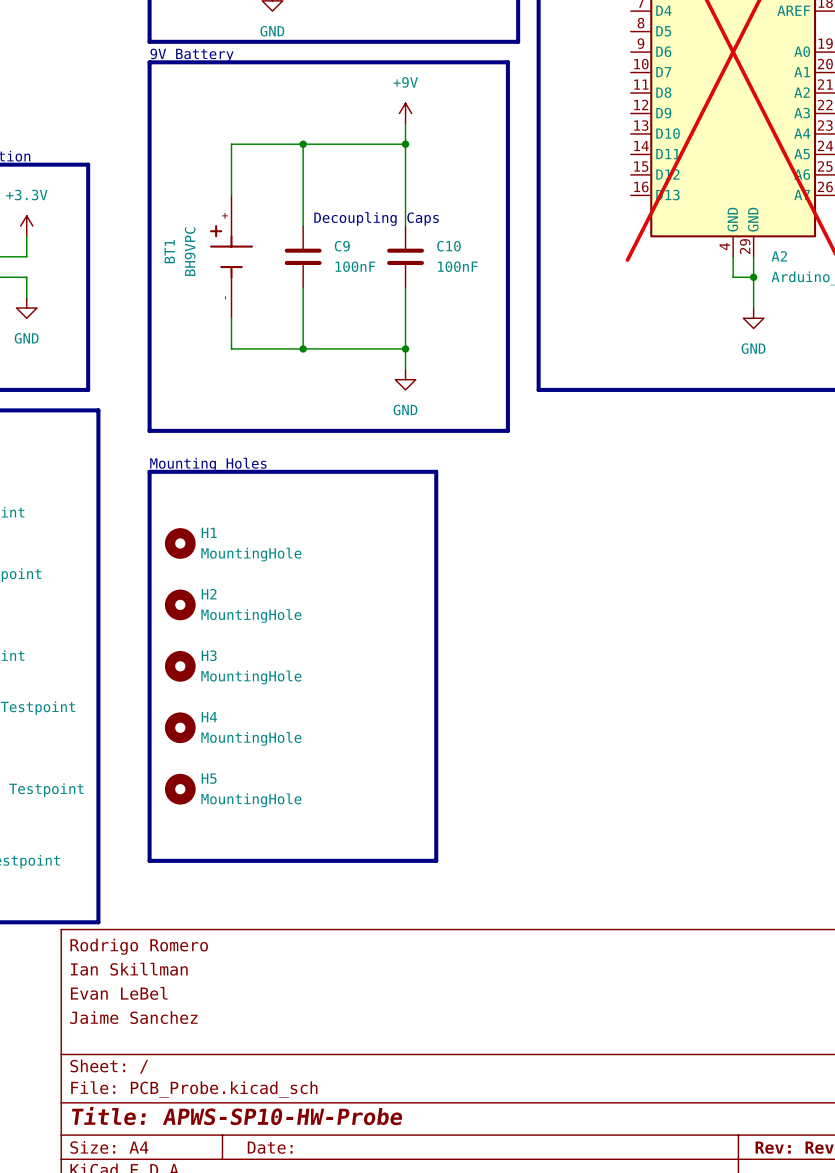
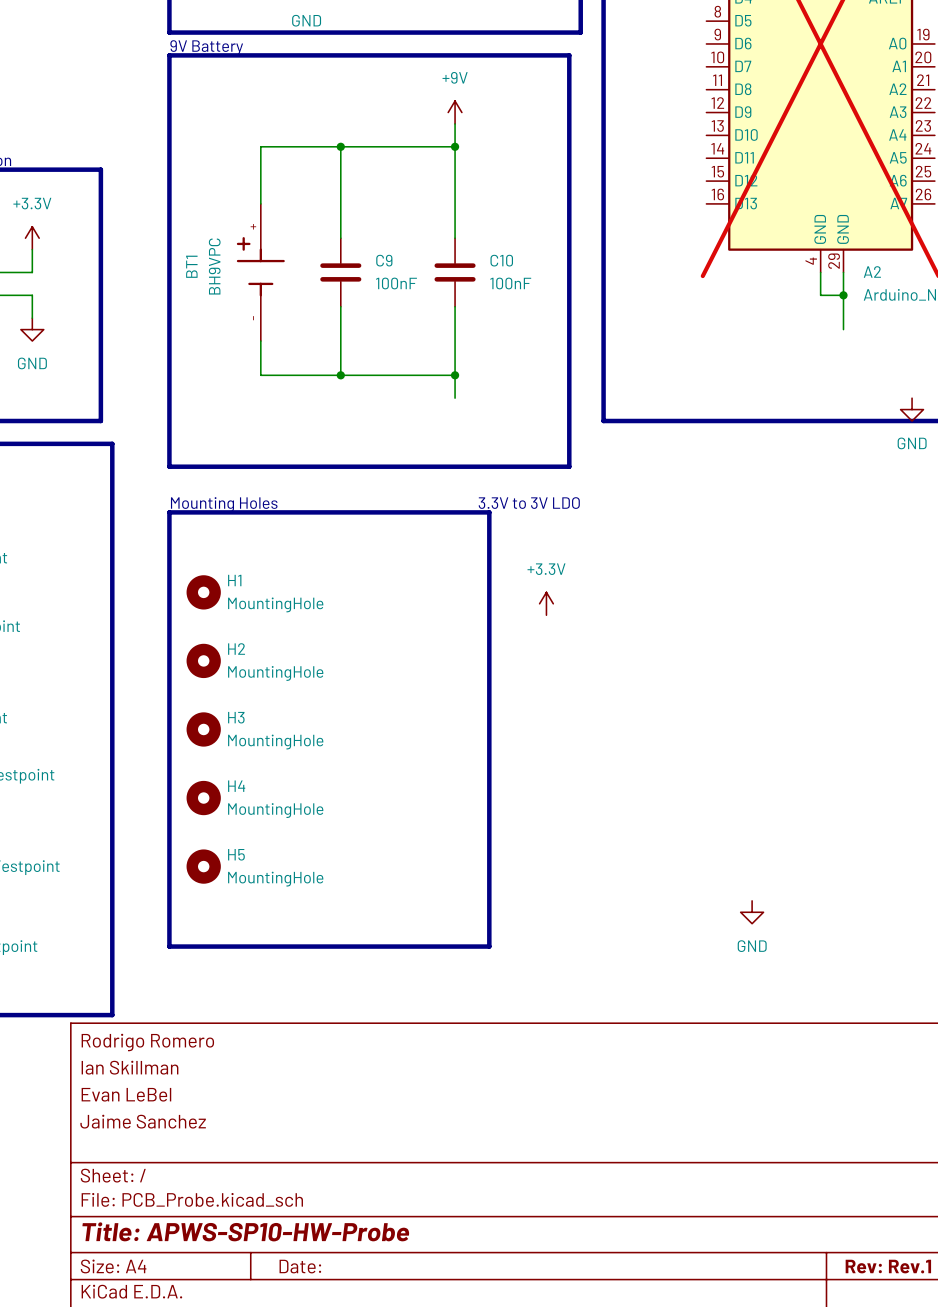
text: Decoupling Caps (376, 218) -> none
power symbol position: GND (753, 318) -> GND (912, 409)
power symbol: GND (405, 379) -> none
text: none -> 3.3V to 3V LDO (529, 503)
power symbol: none -> +3.3V (546, 603)
power symbol: none -> GND (752, 912)

